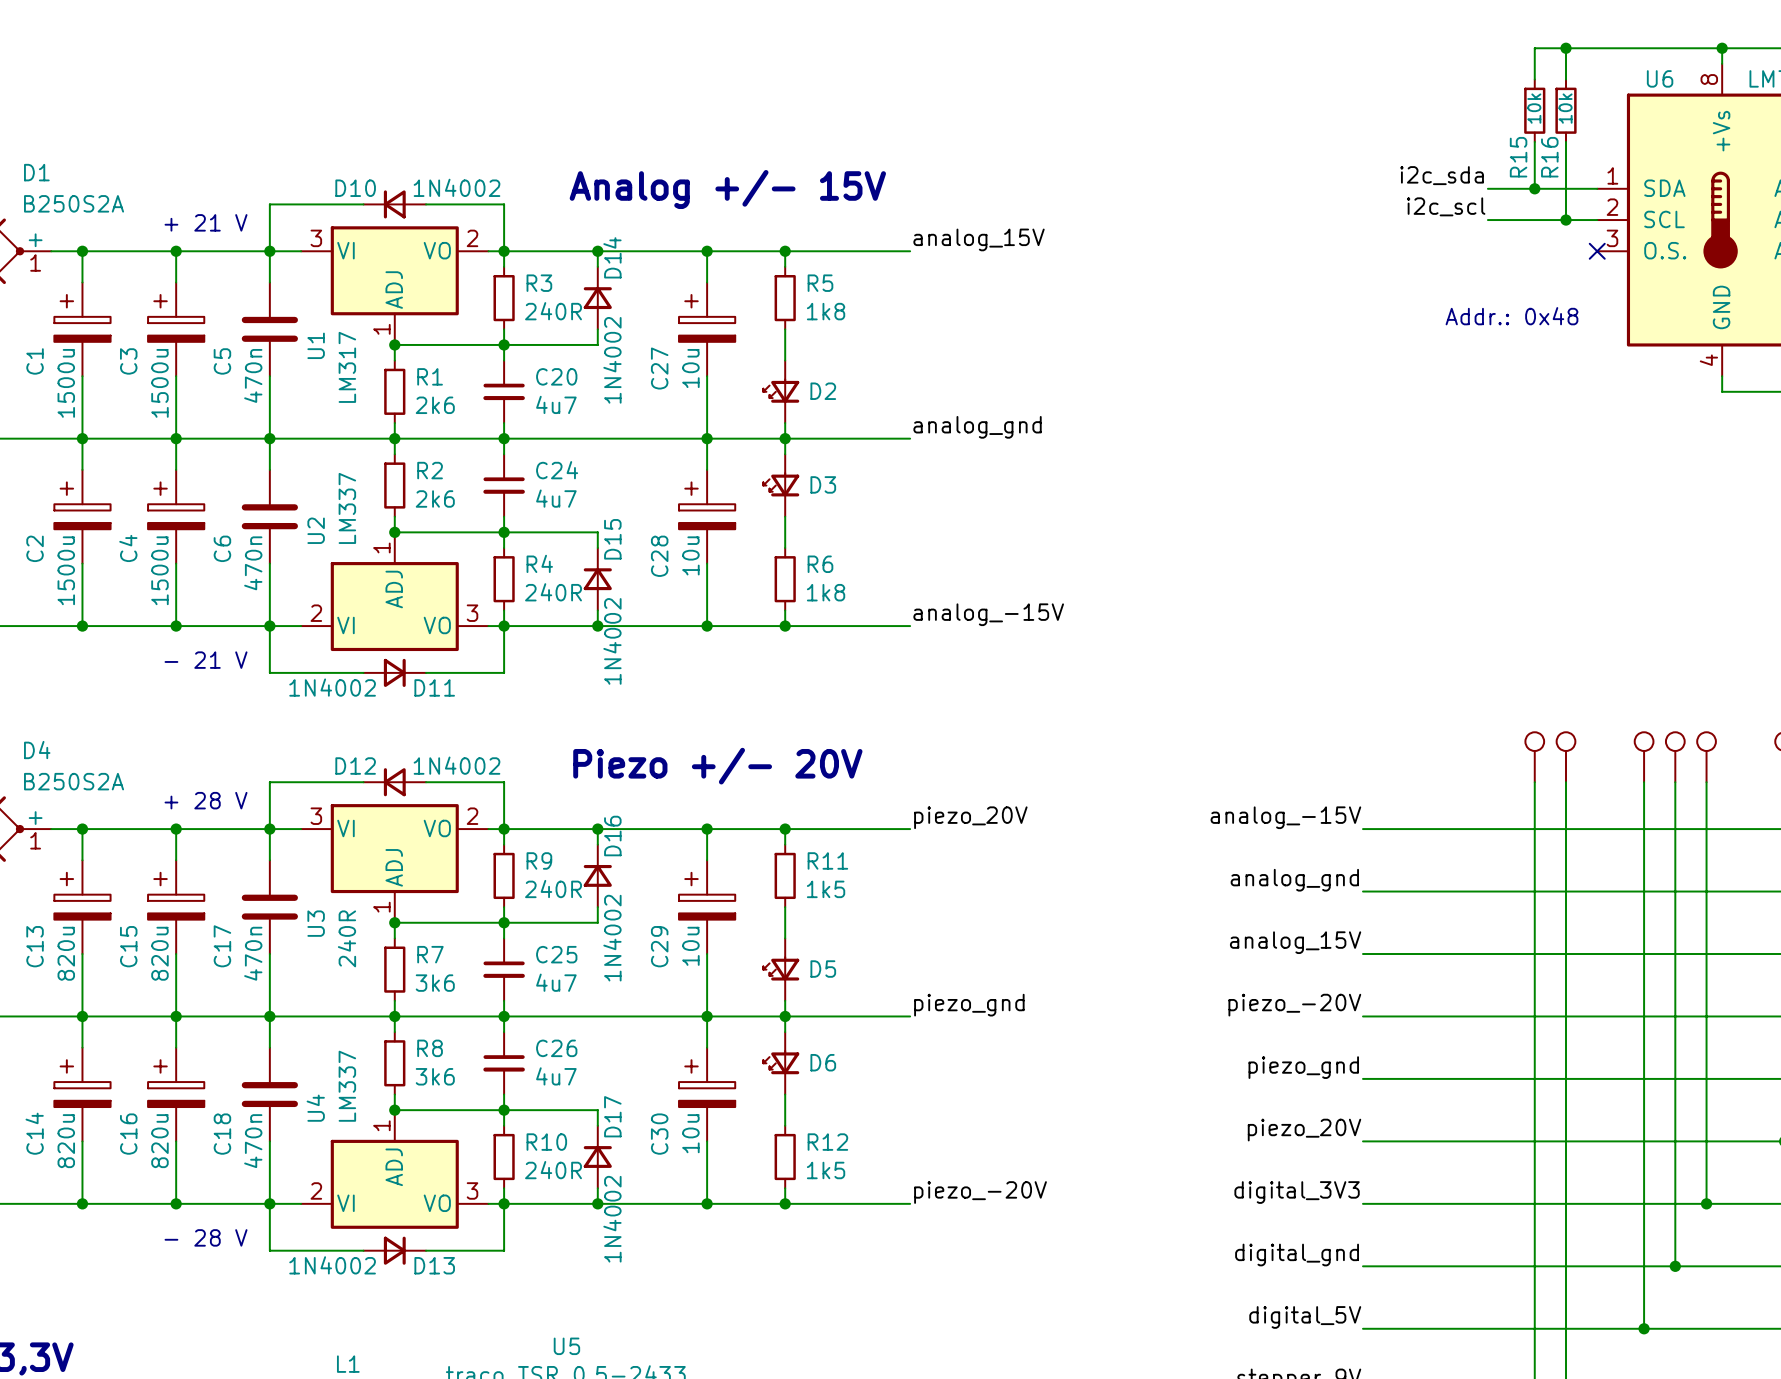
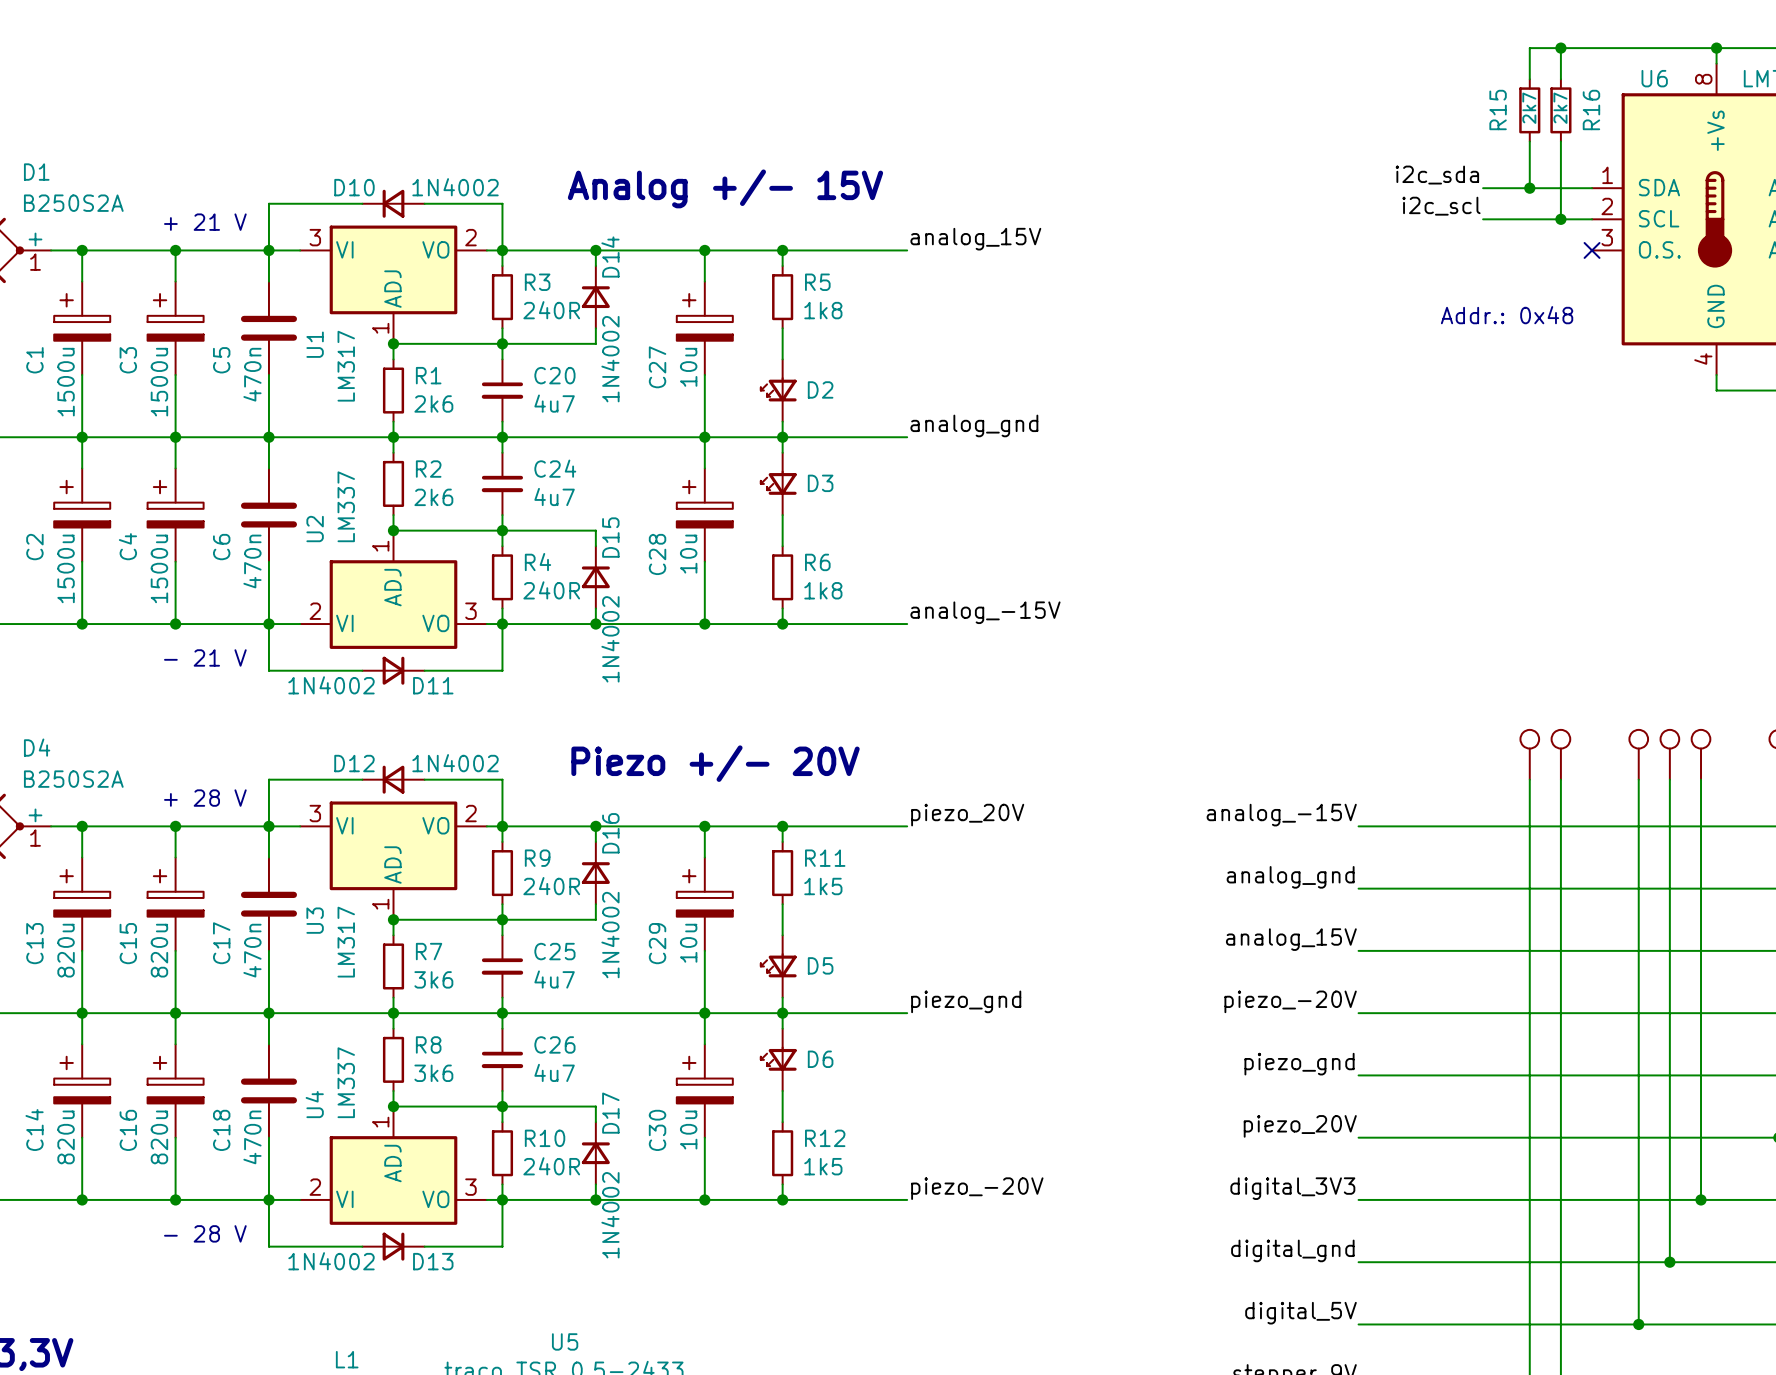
R15 value: 10k (1534, 108) -> 2k7 (1529, 108)
R16 value: 10k (1565, 108) -> 2k7 (1560, 108)
R15 name position: R15 (1518, 157) -> R15 (1498, 109)
R16 name position: R16 (1549, 157) -> R16 (1591, 109)
U3 value: 240R (346, 938) -> LM317 (346, 942)

